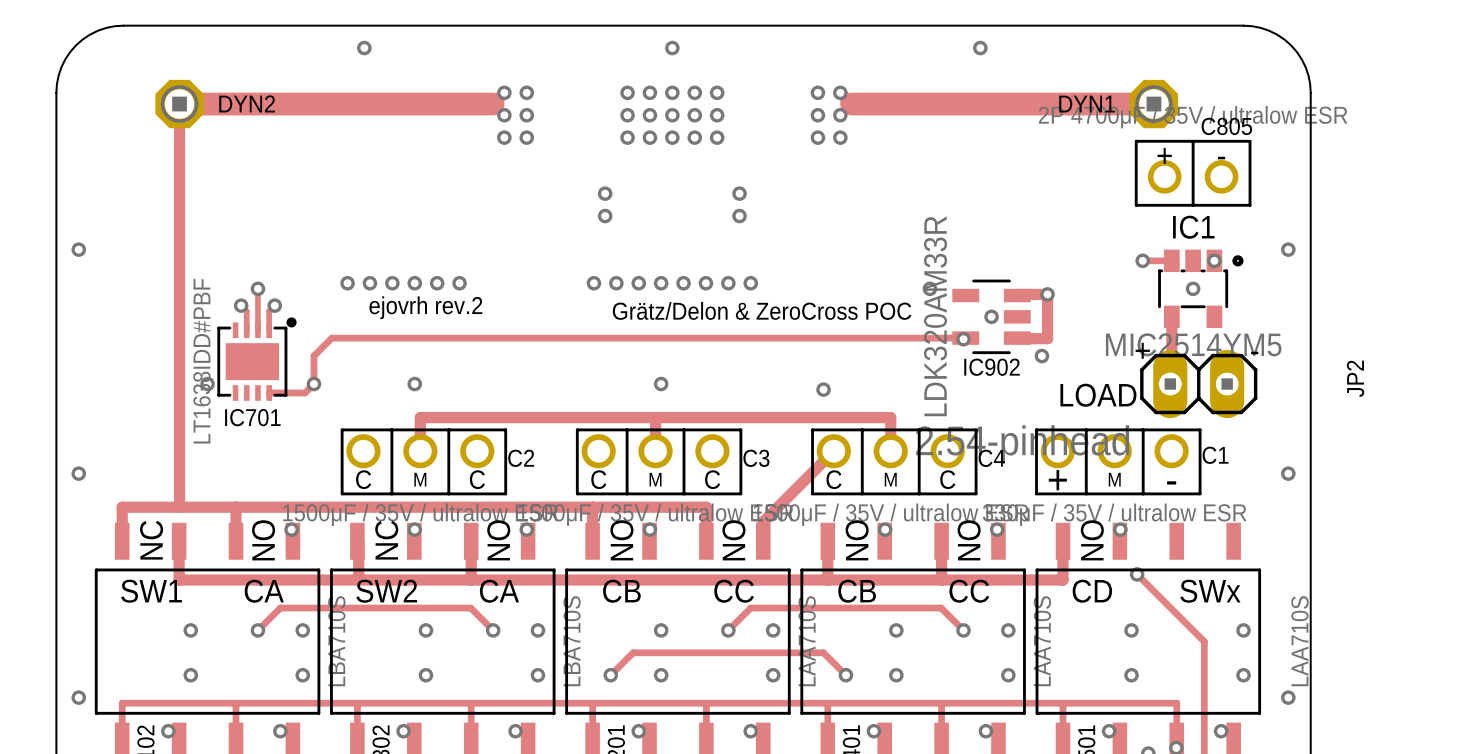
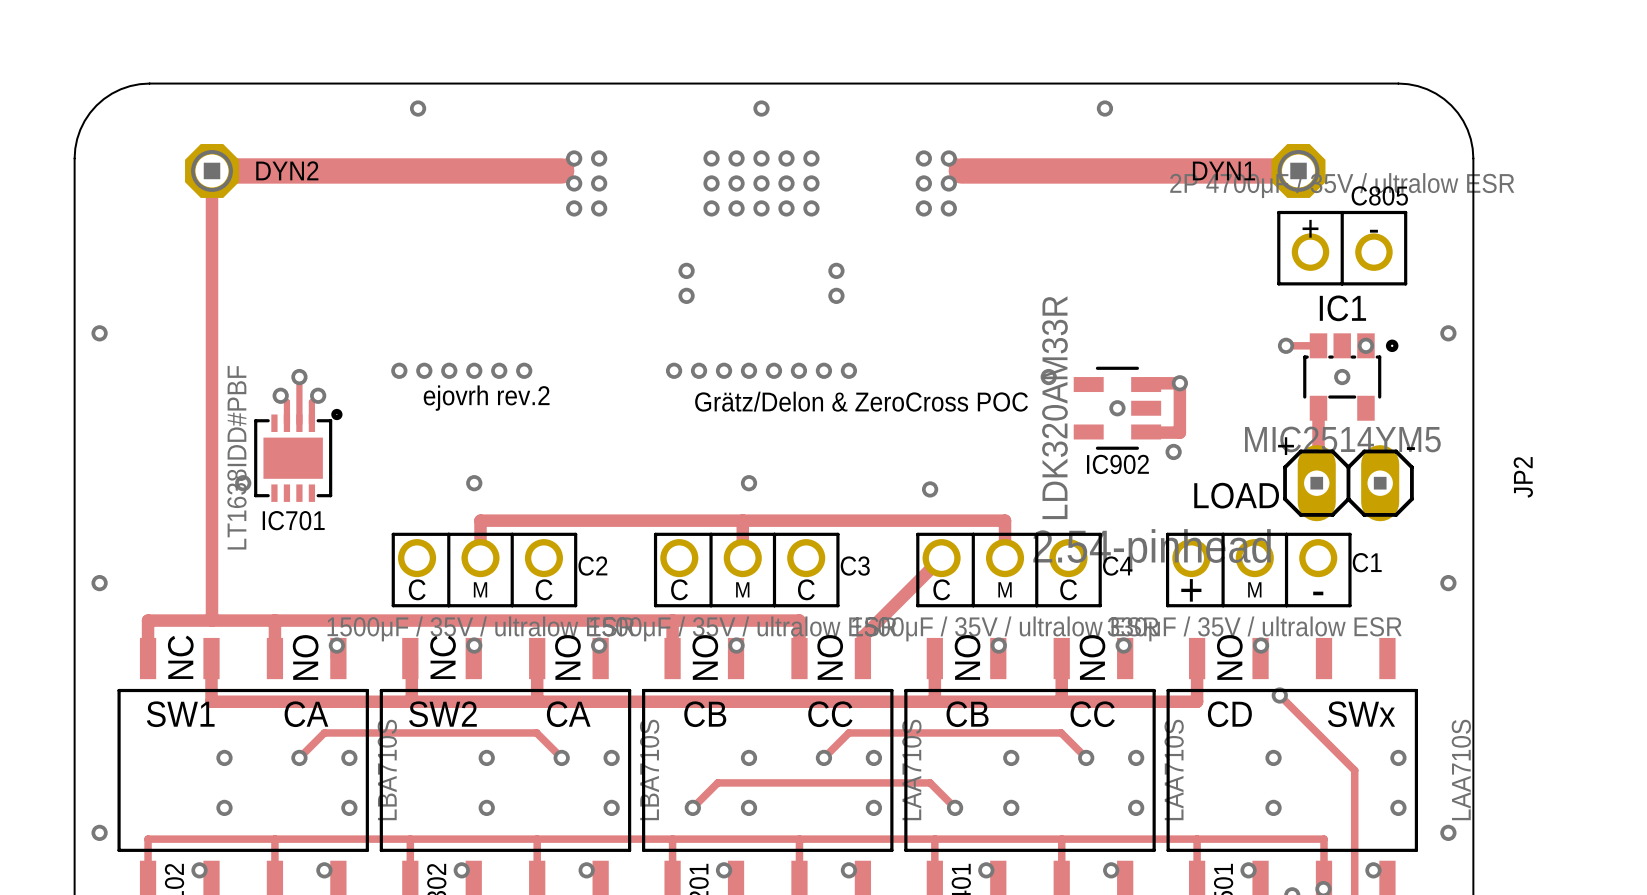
track: (963, 339) (965, 338) (331, 338) (313, 356) (313, 384) (305, 392) (269, 392) -> none
via: (963, 339) -> none
via: (313, 384) -> none

